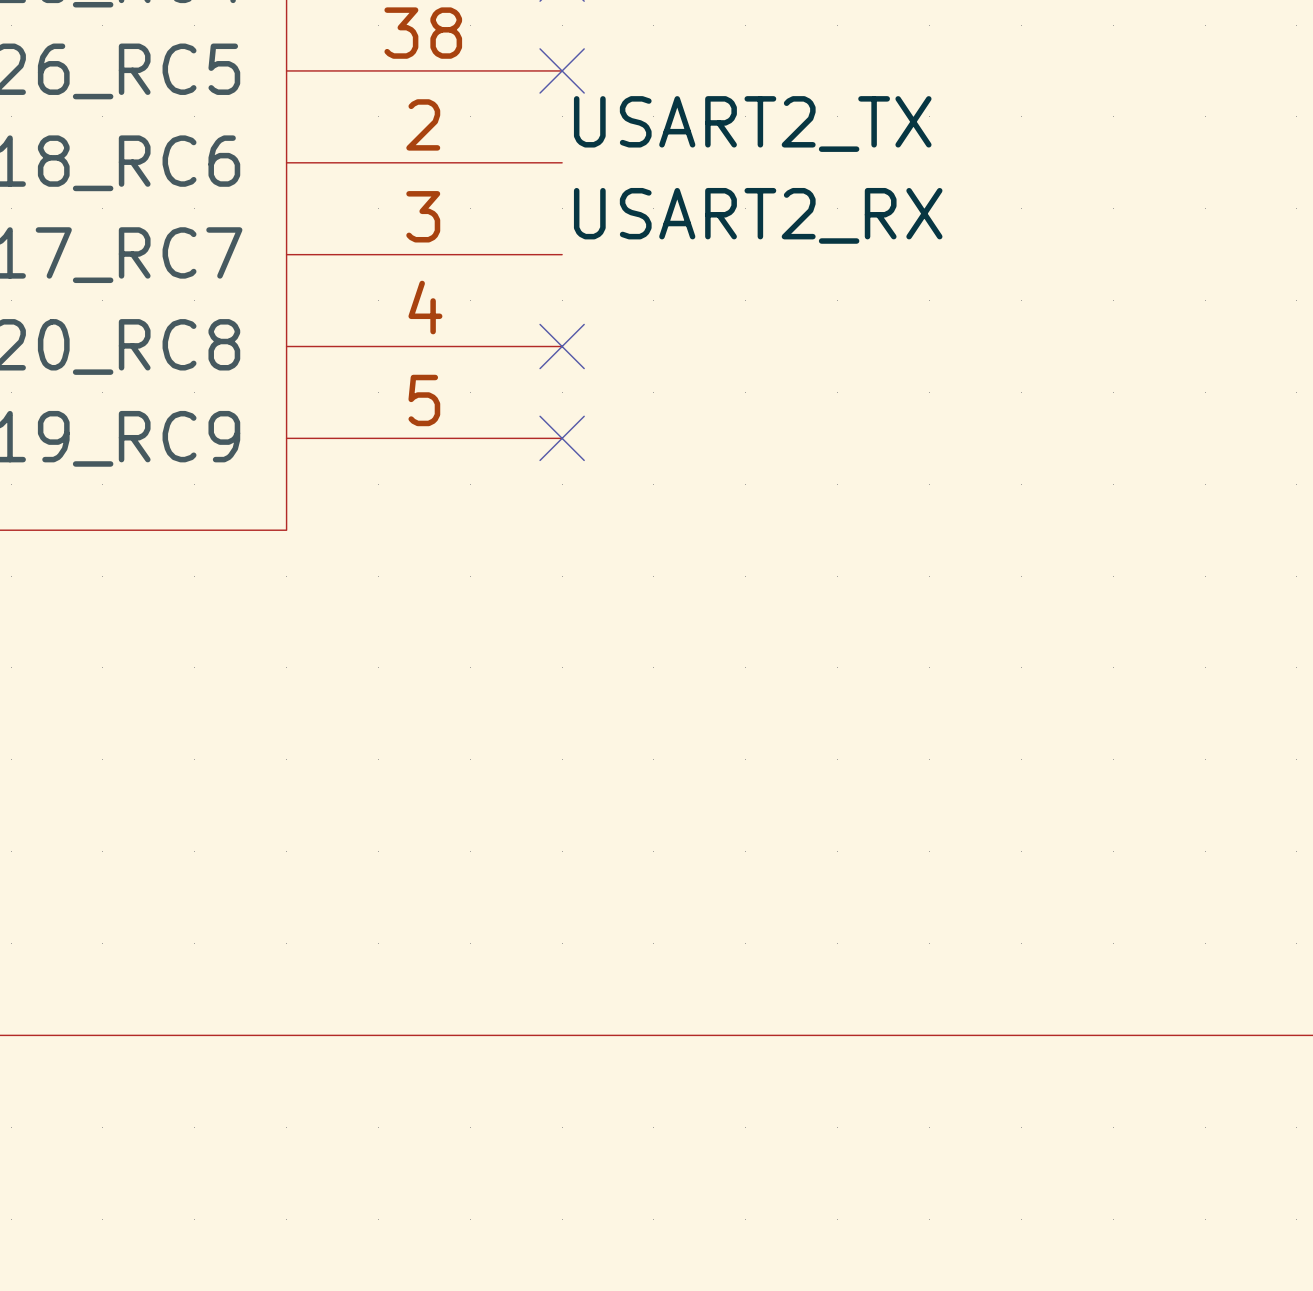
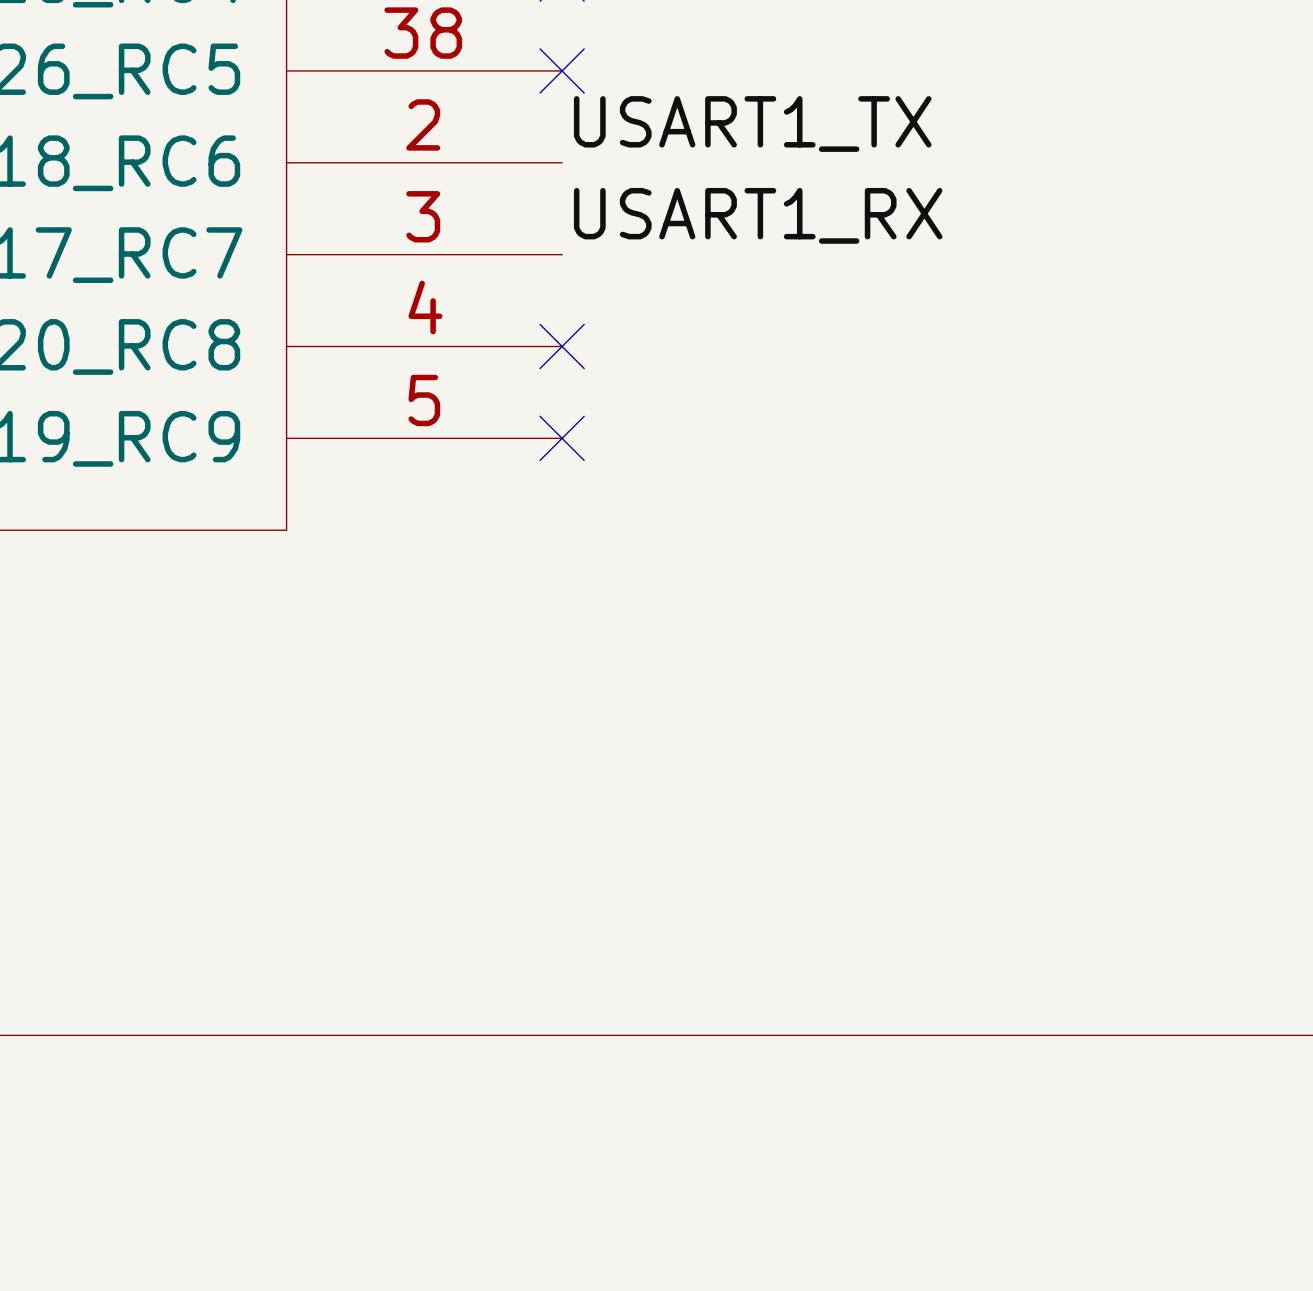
label: USART2_TX (752, 124) -> USART1_TX (752, 124)
label: USART2_RX (758, 215) -> USART1_RX (758, 215)

